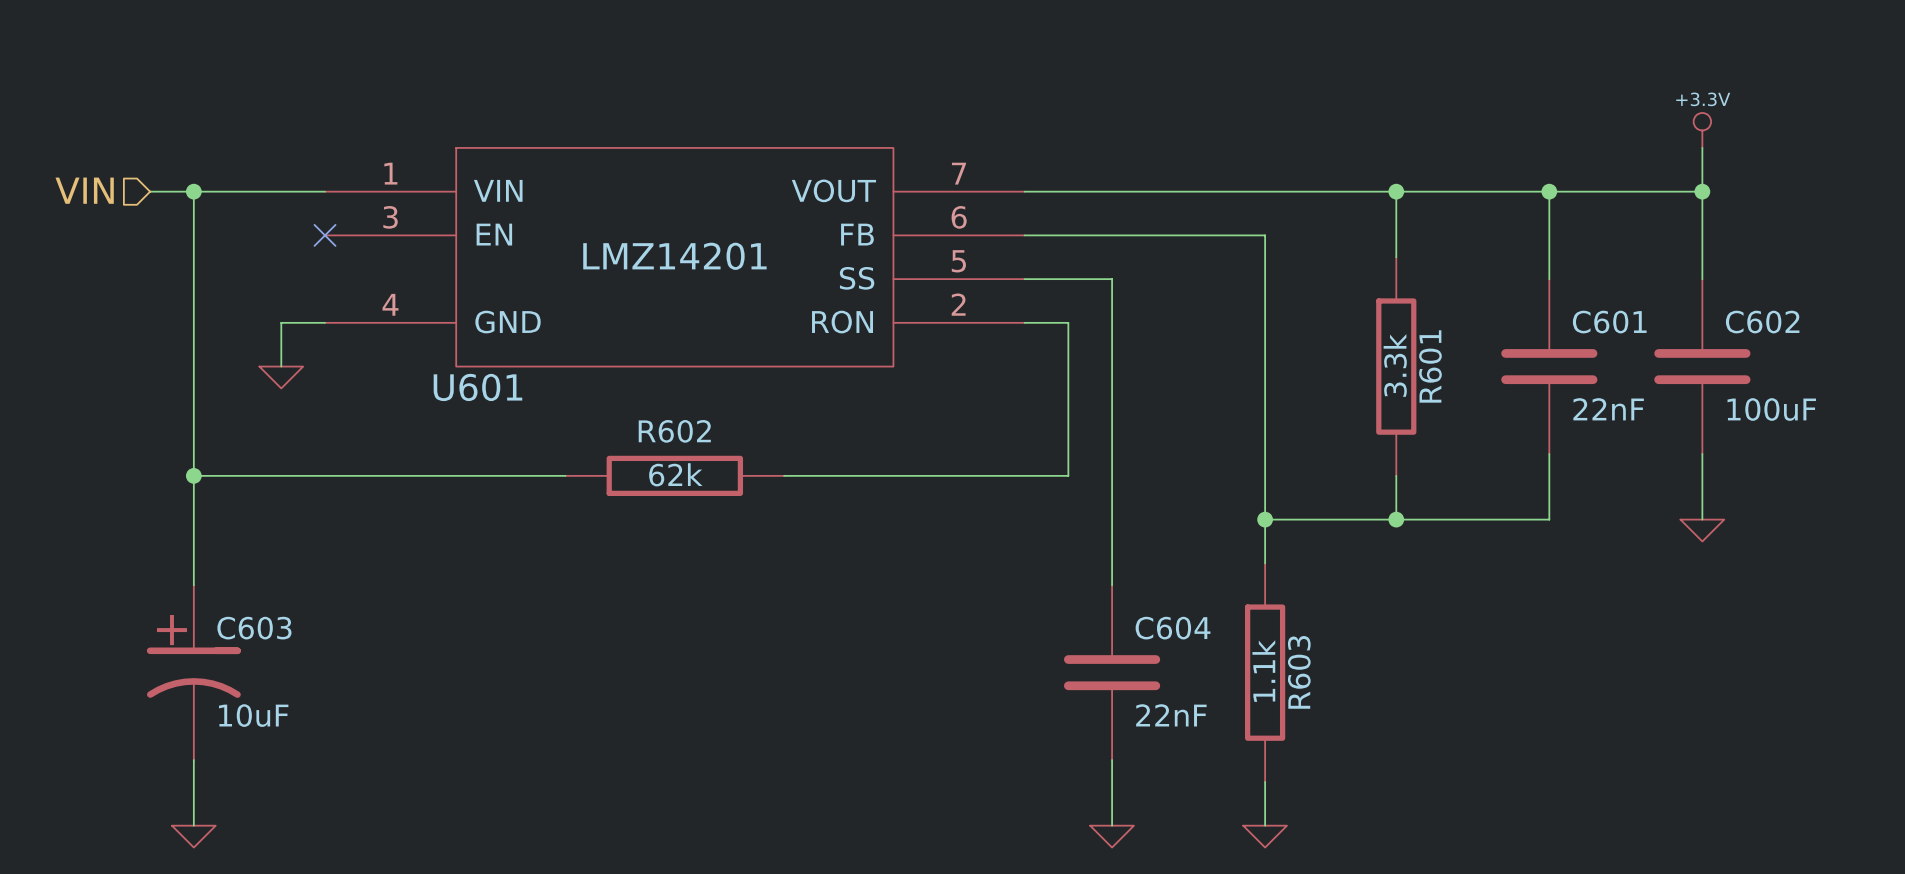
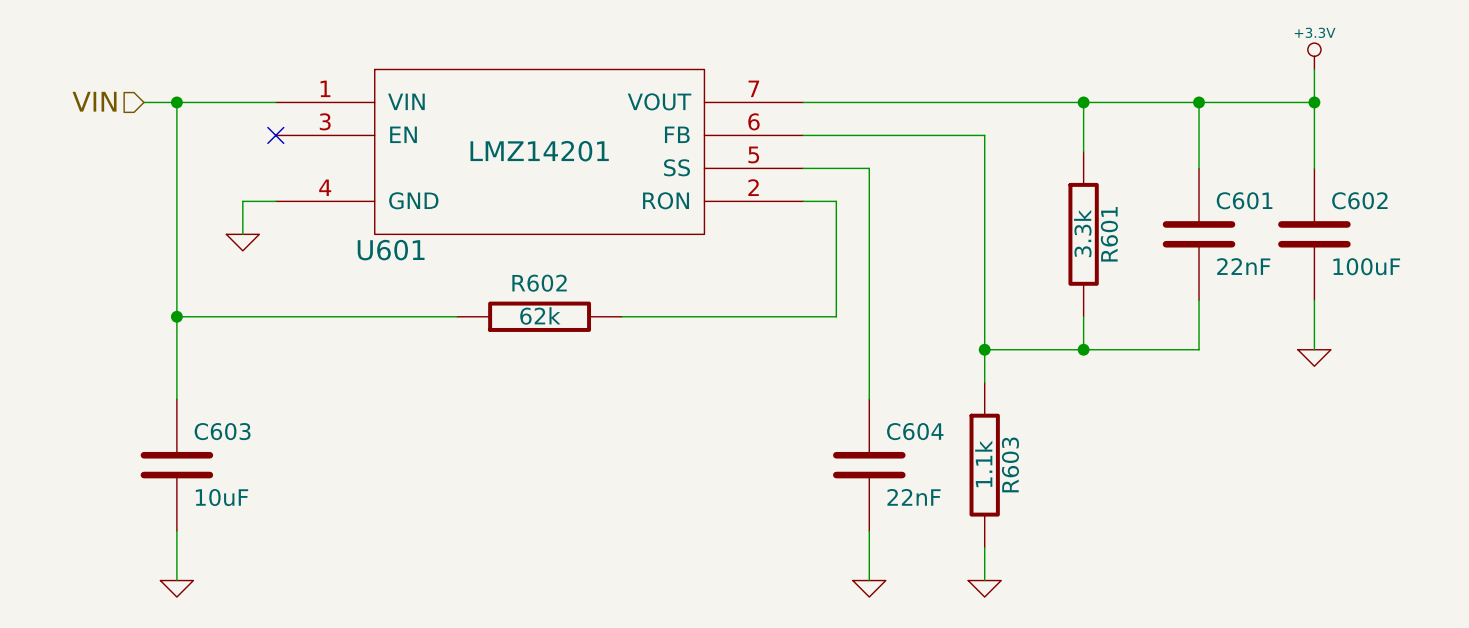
C603 symbol: [146, 585, 241, 761] -> [140, 399, 214, 532]

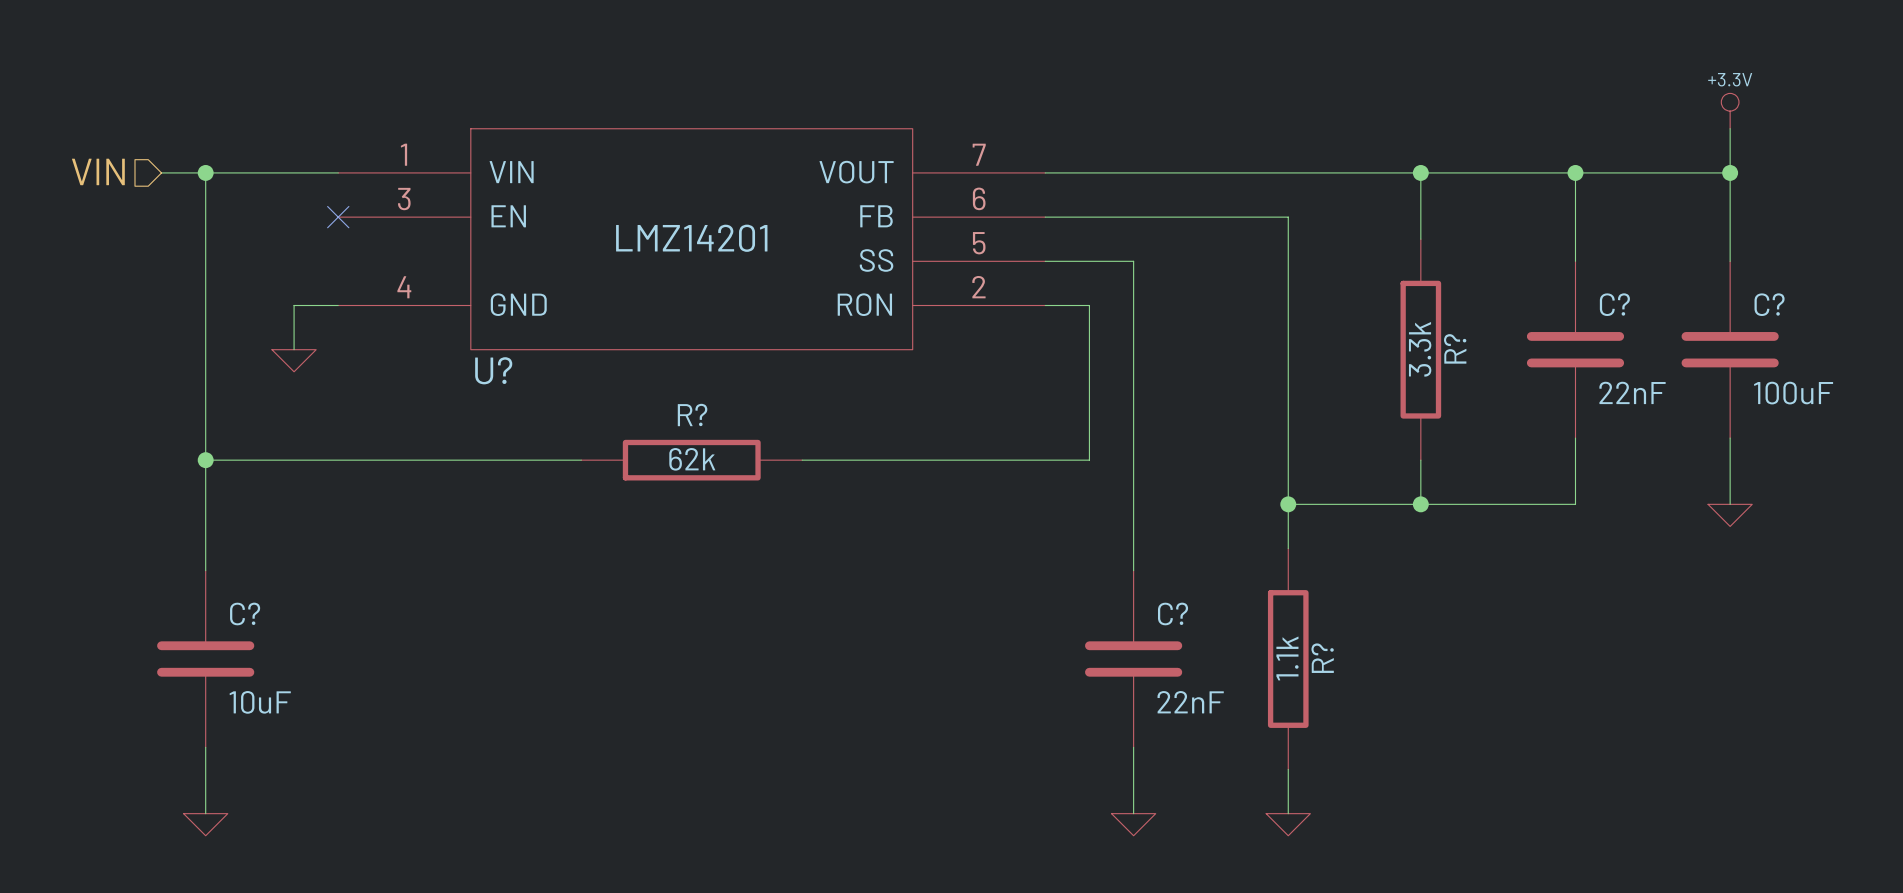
C601 name: C601 (1244, 200) -> C? (1614, 304)
C602 name: C602 (1359, 200) -> C? (1769, 304)
R601 name: R601 (1109, 234) -> R? (1455, 348)
U601 name: U601 (391, 250) -> U? (493, 370)
R602 name: R602 (539, 283) -> R? (692, 415)
C603 name: C603 (222, 431) -> C? (245, 613)
C604 name: C604 (915, 431) -> C? (1173, 613)
R603 name: R603 (1010, 464) -> R? (1322, 658)

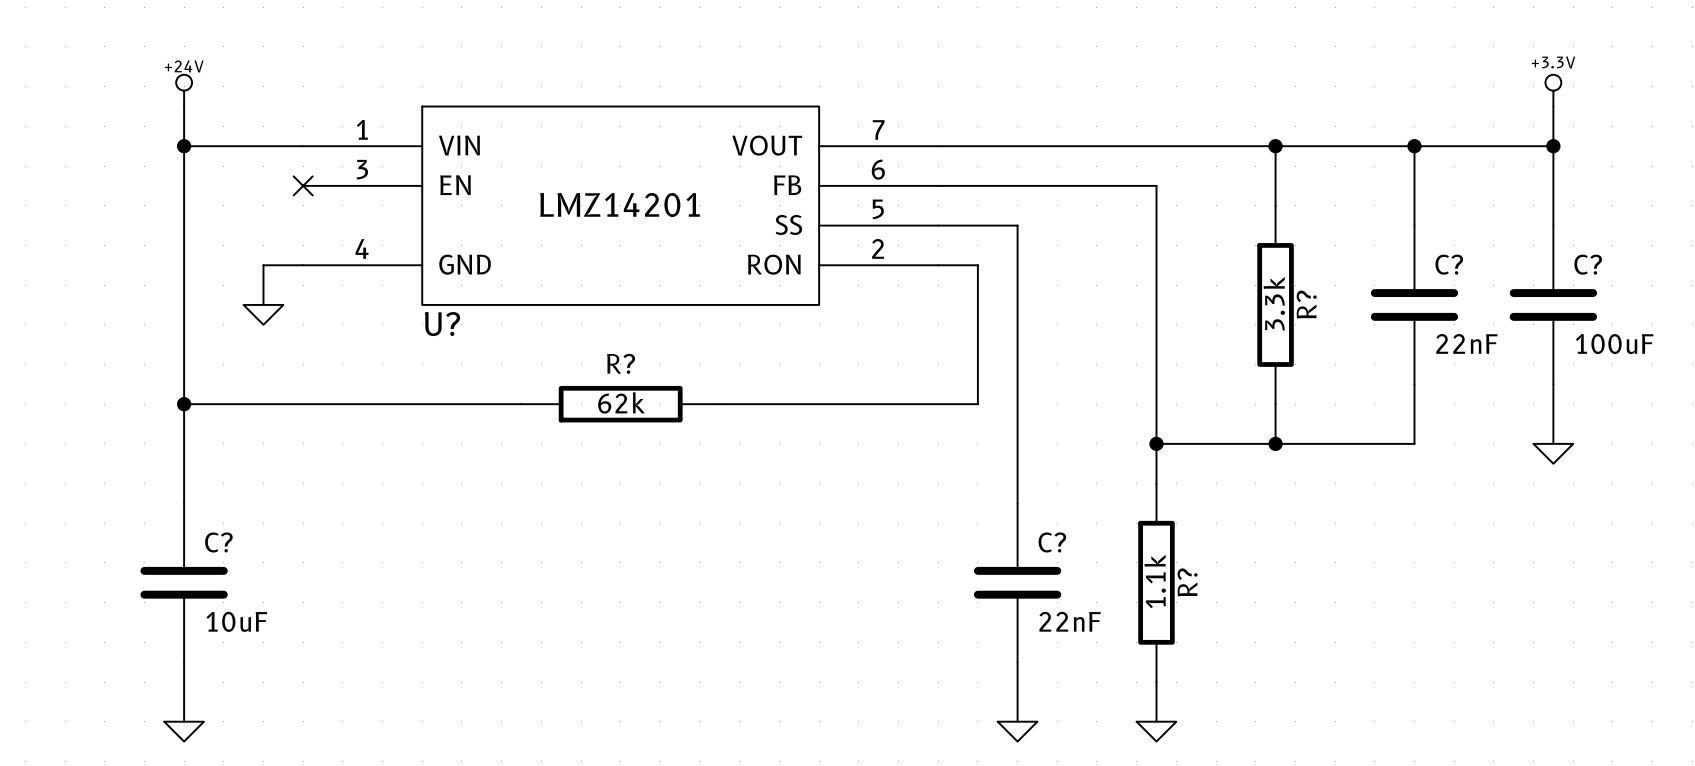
power symbol: none -> +24V (184, 90)
hierarchical label: VIN (98, 171) -> none
wire: (161, 172) (205, 172) -> (184, 106) (184, 146)

